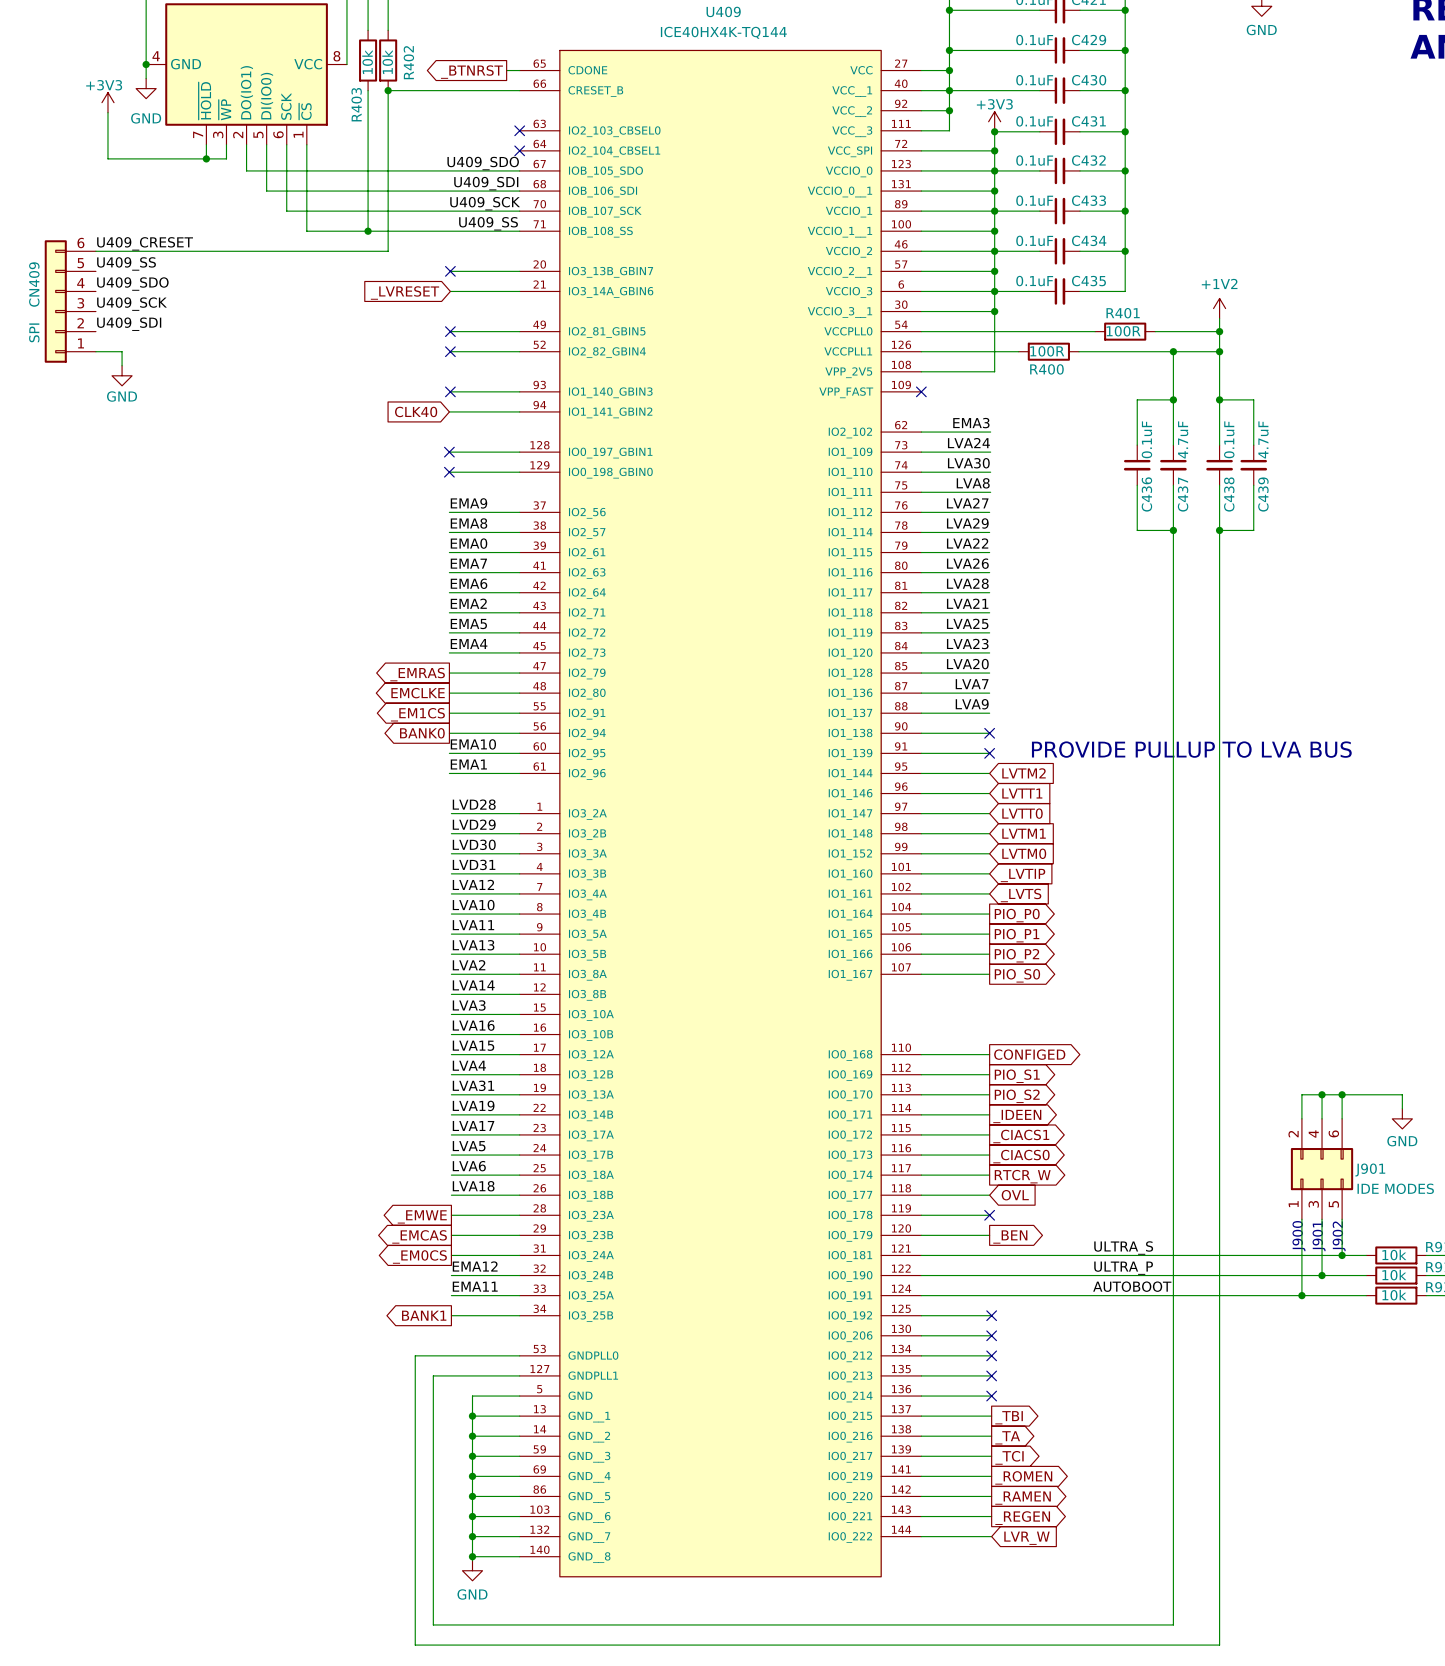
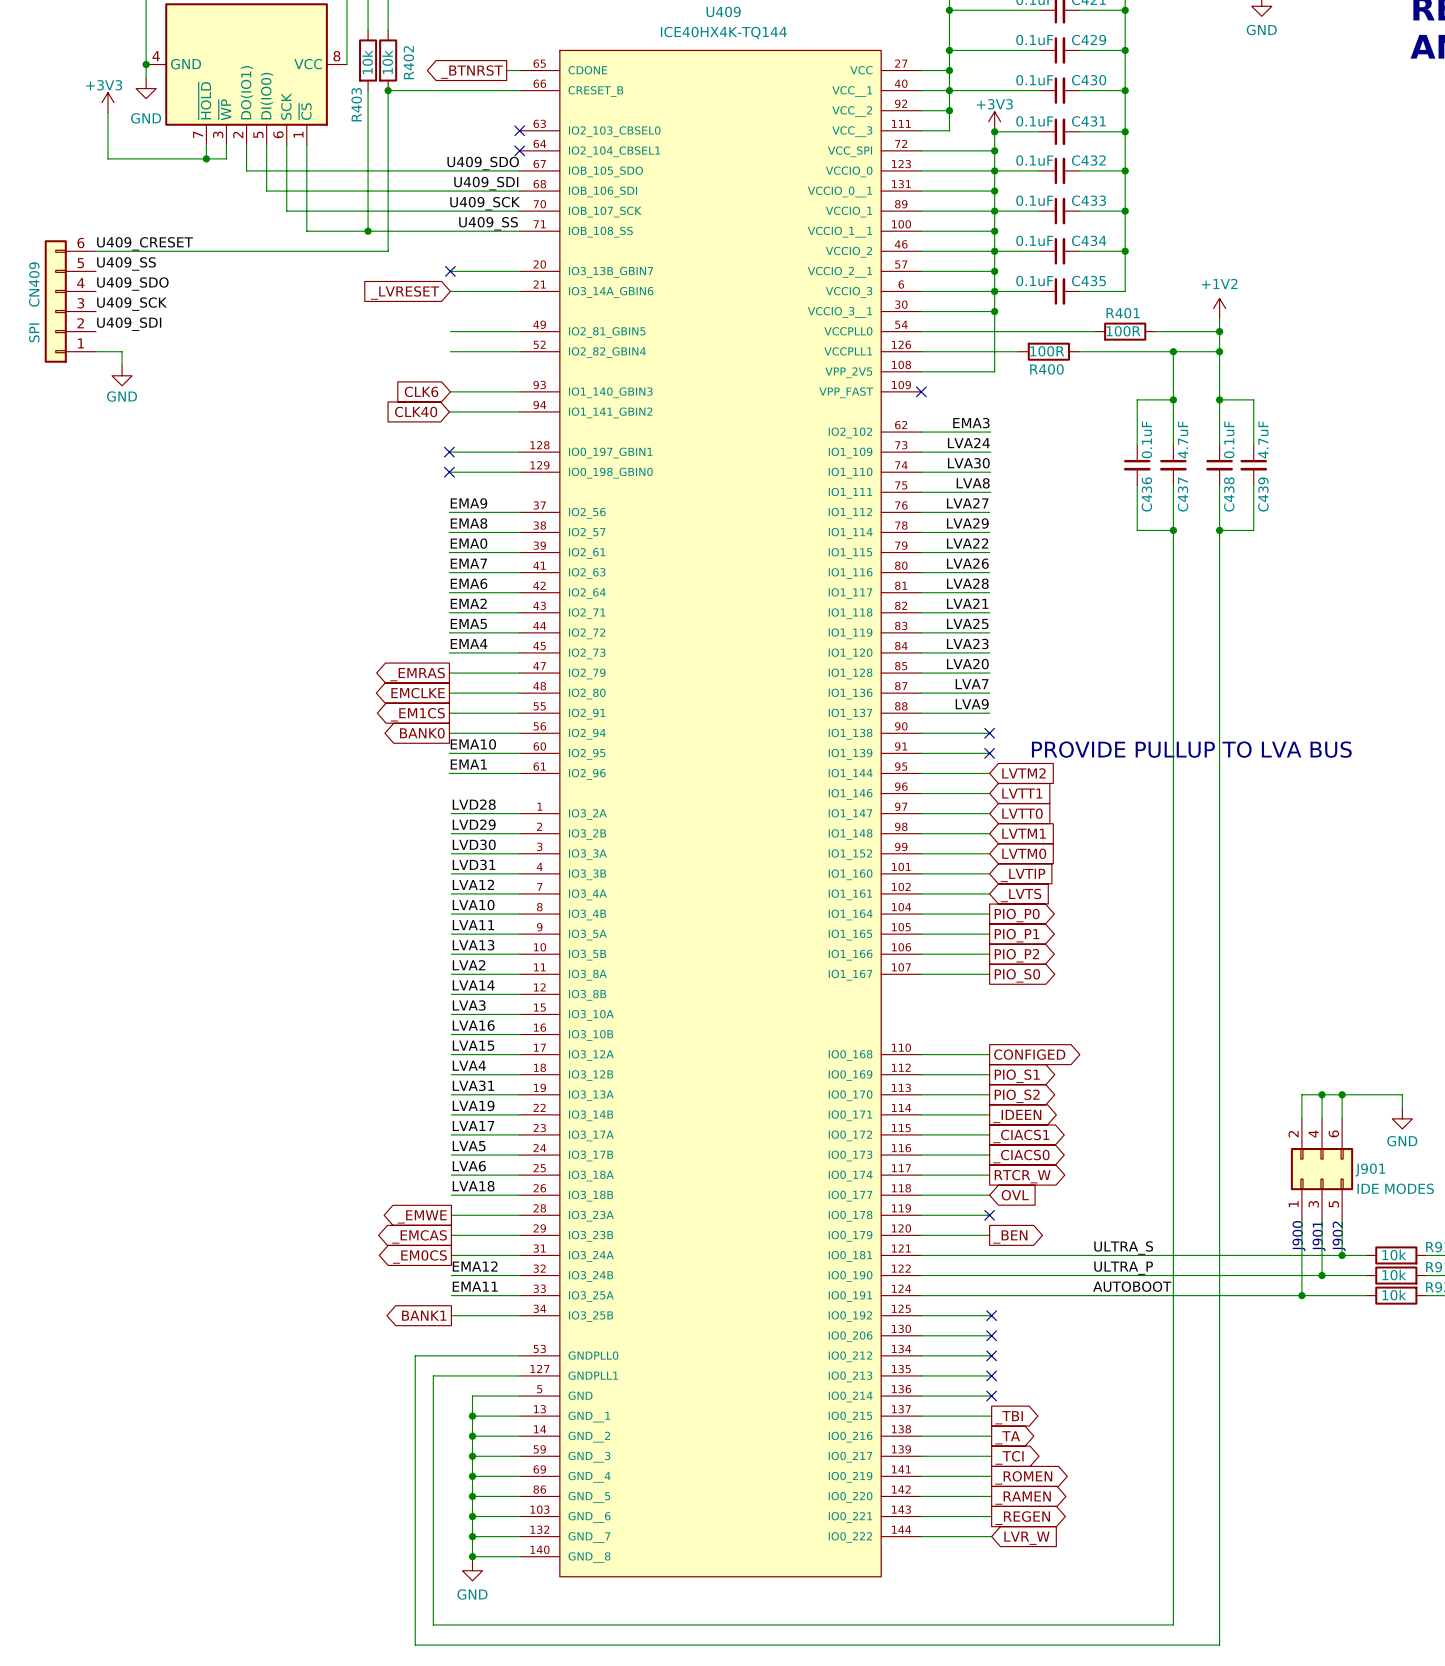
no-connect mark: (450, 331) -> none
no-connect mark: (450, 351) -> none
global label: none -> CLK6 (421, 391)
no-connect mark: (450, 391) -> none

